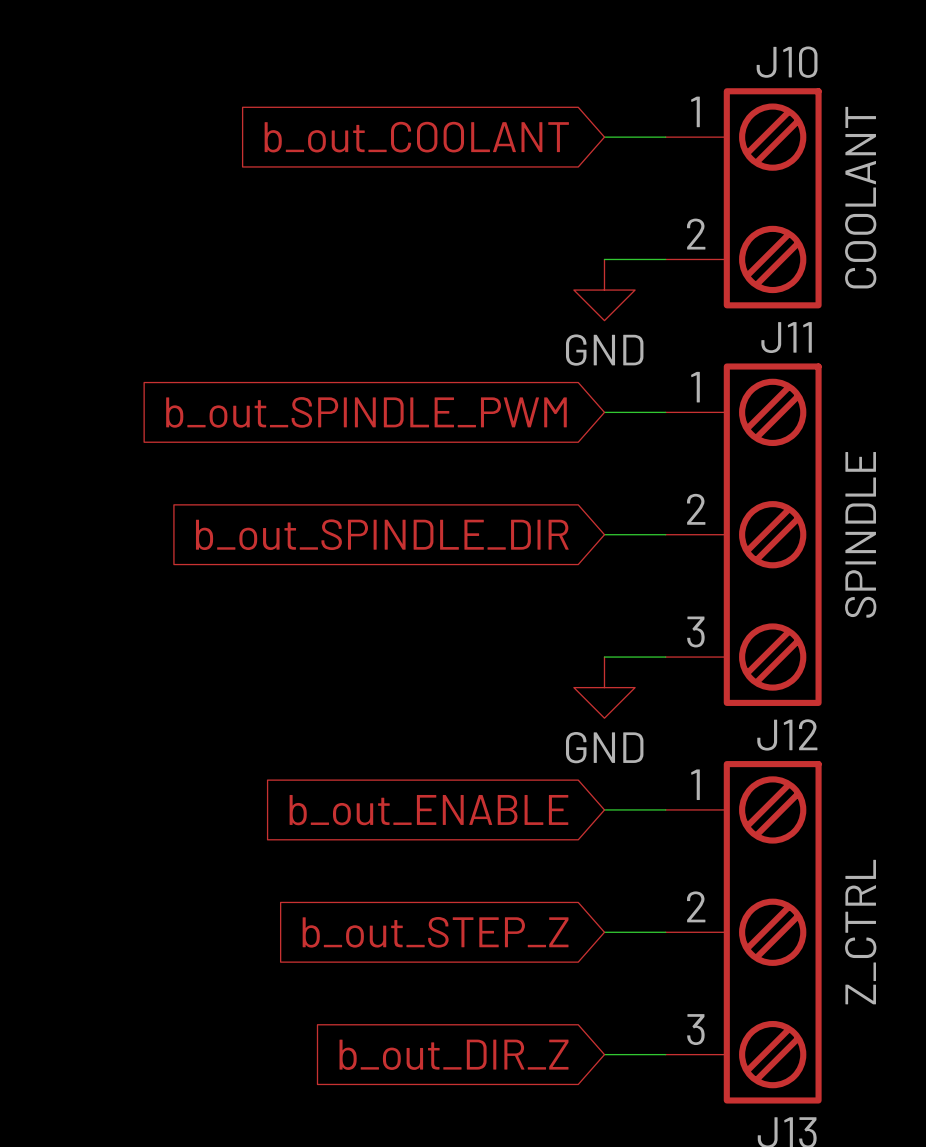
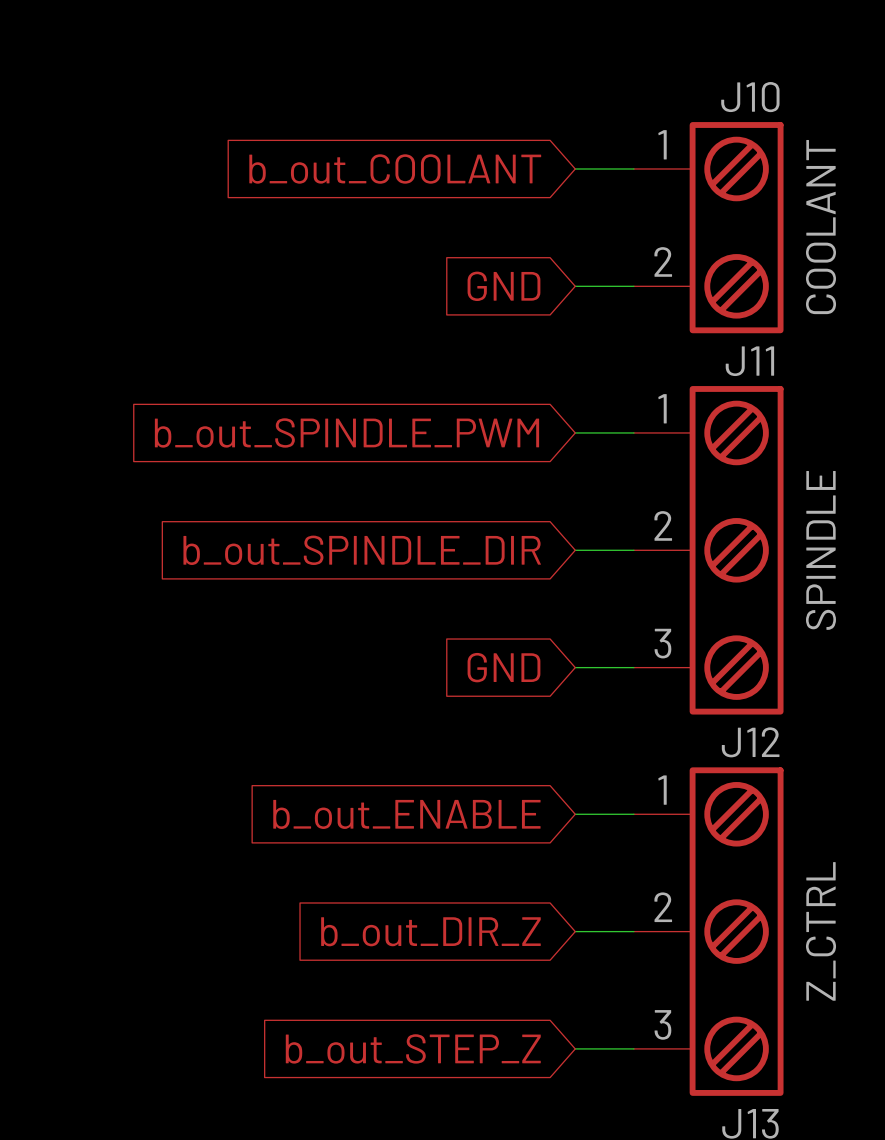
global label: none -> GND (503, 286)
power symbol: GND (604, 290) -> none
global label: none -> GND (503, 667)
power symbol: GND (604, 687) -> none
global label: b_out_STEP_Z (435, 932) -> b_out_DIR_Z (430, 931)
global label: b_out_DIR_Z (454, 1054) -> b_out_STEP_Z (413, 1048)

